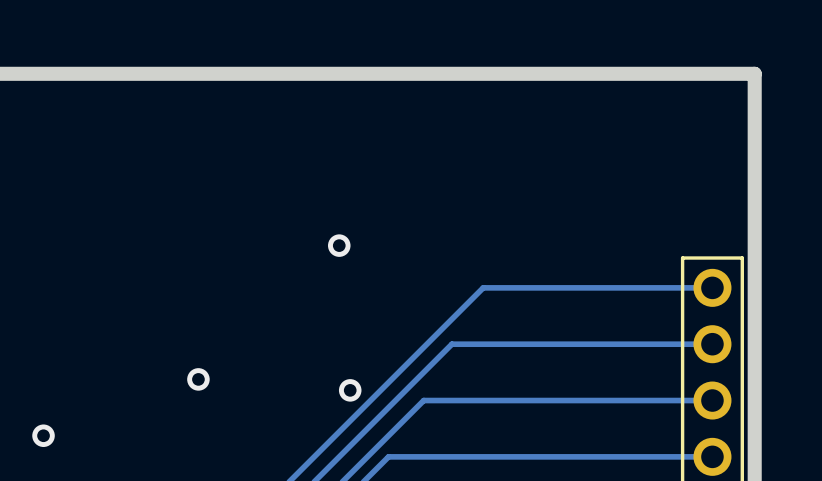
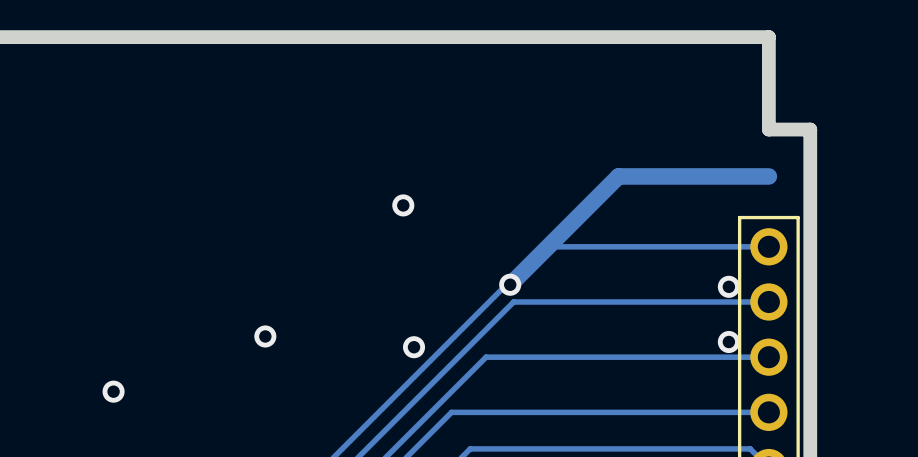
board edge: (712, 73) (754, 73) (754, 168) -> (768, 37) (768, 129) (810, 129)
track: none -> (768, 176) (618, 176) (510, 284)
via: none -> (510, 284)
via: none -> (728, 286)
via: none -> (728, 342)

